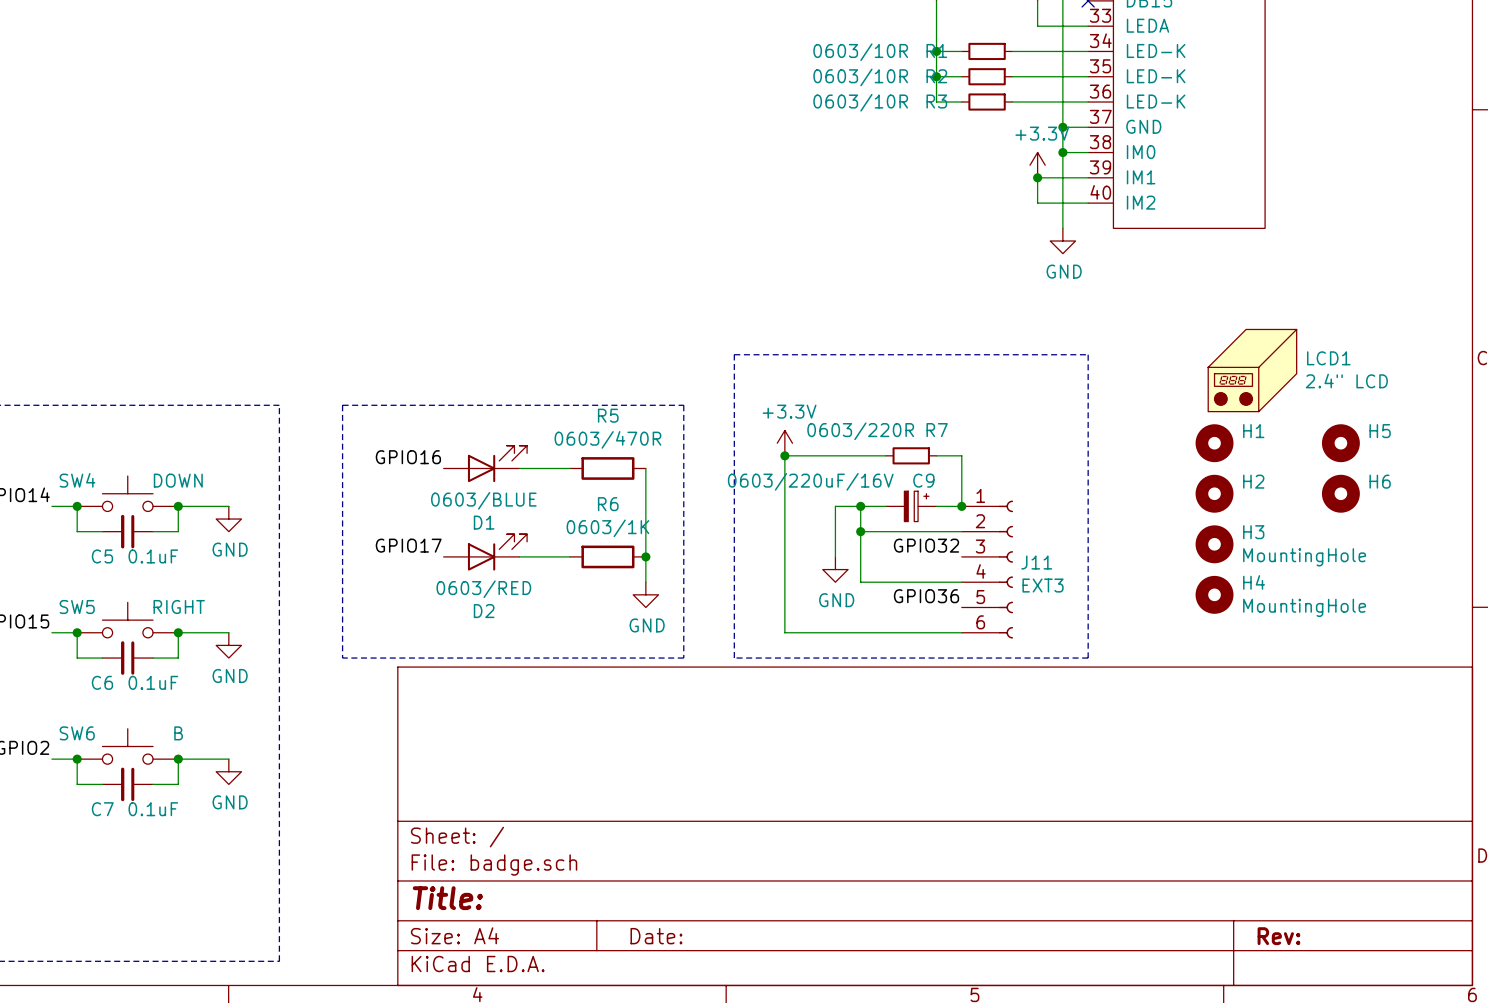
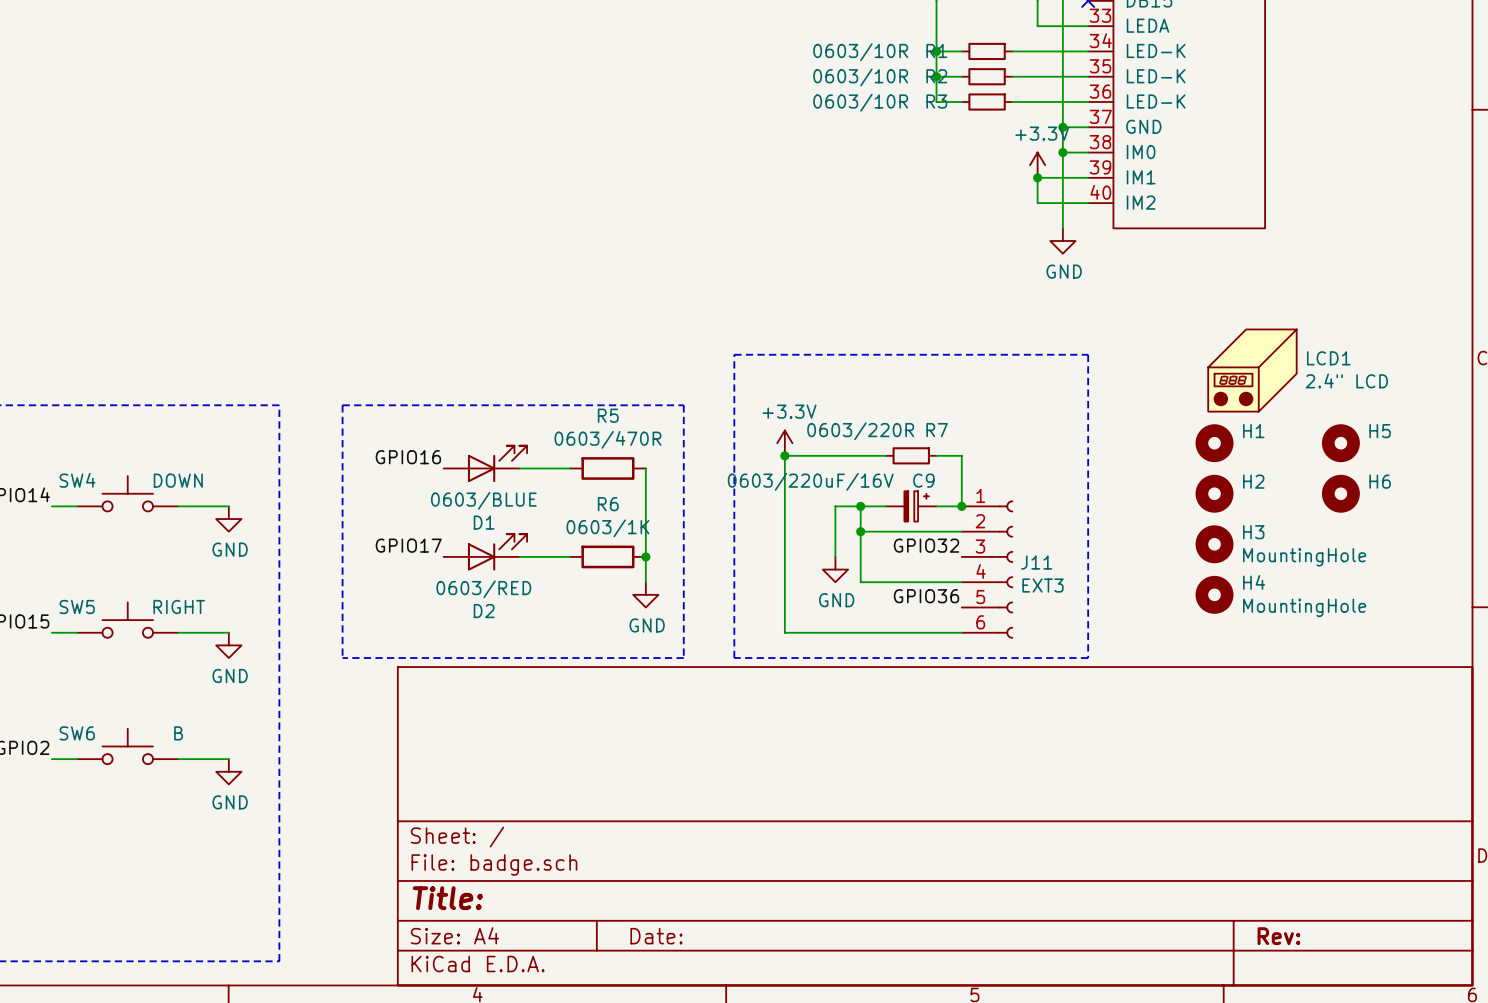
wire: (77, 506) (77, 531) (102, 531) -> none
junction: (77, 506) -> none
wire: (178, 506) (178, 531) (153, 531) -> none
junction: (178, 506) -> none
C5: 0.1uF (127, 531) -> none
wire: (77, 632) (77, 658) (102, 658) -> none
junction: (77, 632) -> none
wire: (178, 632) (178, 658) (153, 658) -> none
junction: (178, 632) -> none
C6: 0.1uF (127, 658) -> none
wire: (77, 759) (77, 784) (102, 784) -> none
junction: (77, 759) -> none
wire: (178, 759) (178, 784) (153, 784) -> none
junction: (178, 759) -> none
C7: 0.1uF (127, 784) -> none

